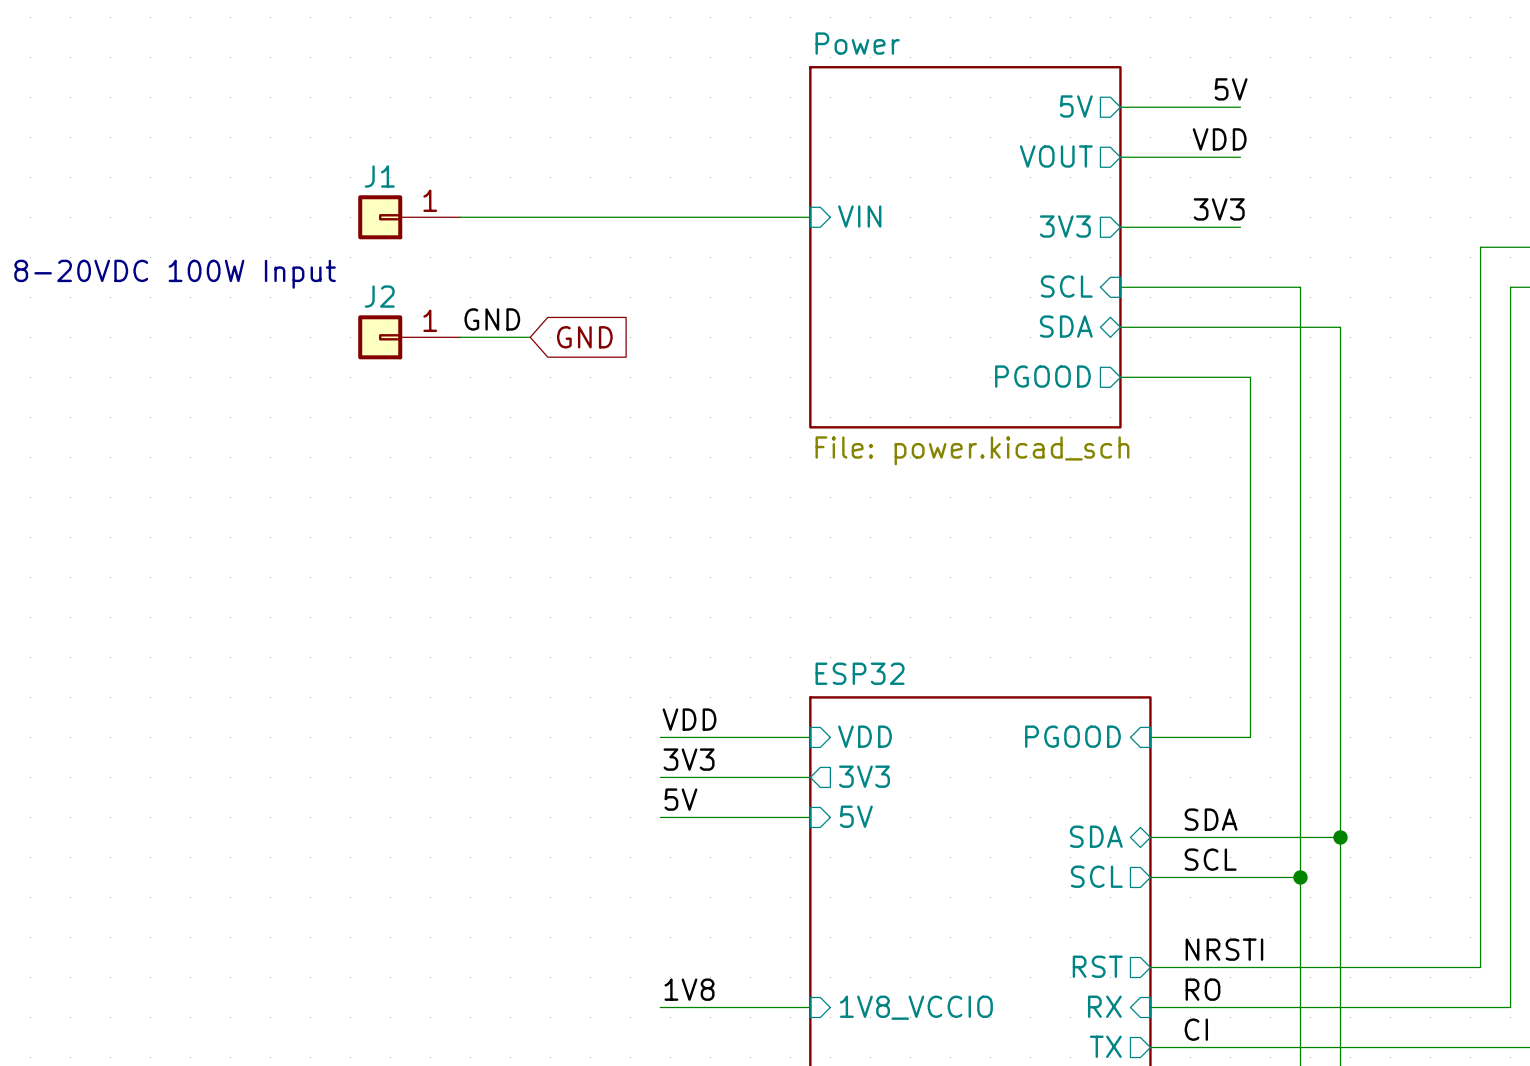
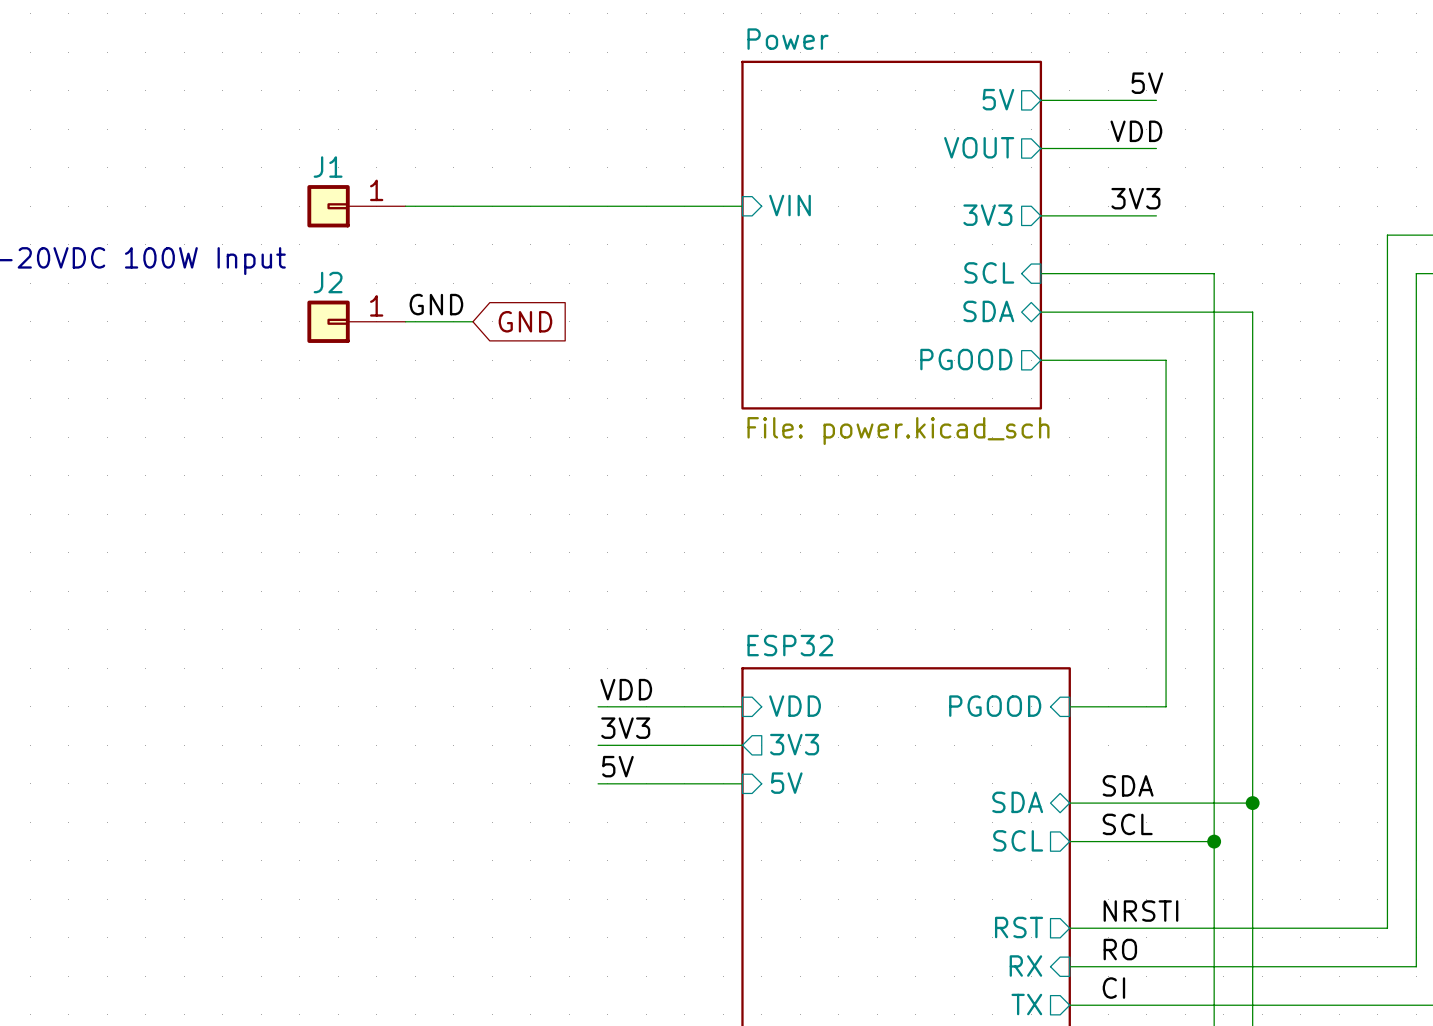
label: 1V8 (689, 989) -> none
wire: (660, 1007) (810, 1007) -> none
sheet pin: 1V8_VCCIO (916, 1007) -> none

